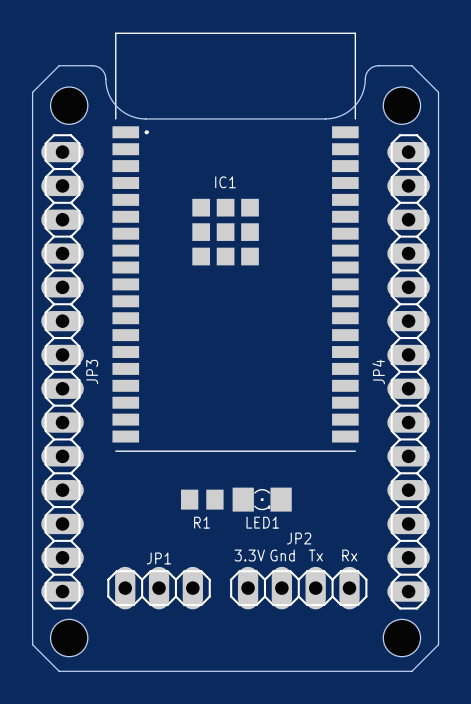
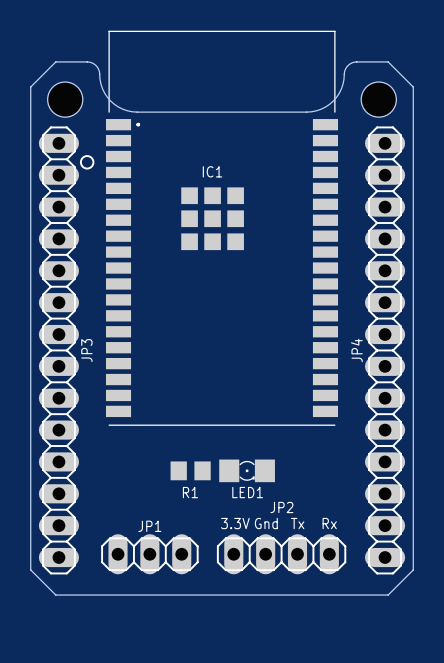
drawing: none -> [79, 155, 95, 170]
board edge: (32, 604) (32, 644) (59, 671) (411, 671) (438, 644) (438, 604) -> (30, 569) (55, 595) (388, 595) (413, 569)
hole: (69, 638) -> none
hole: (401, 638) -> none

